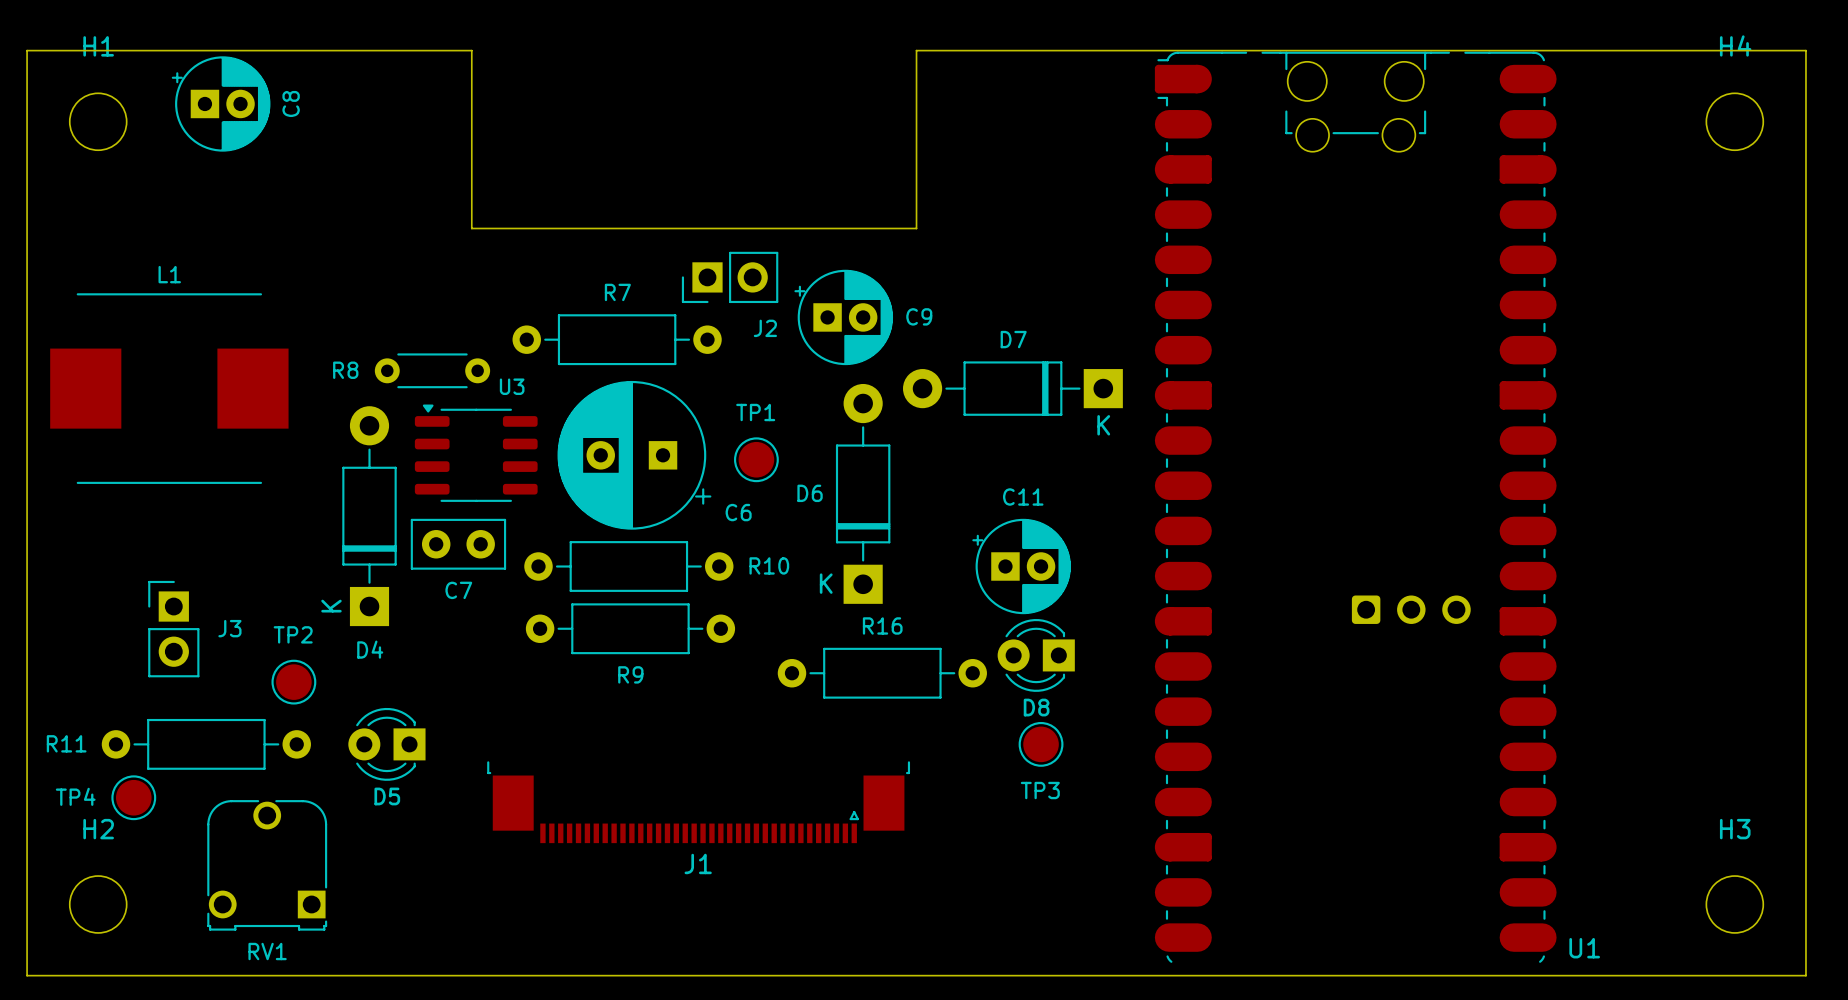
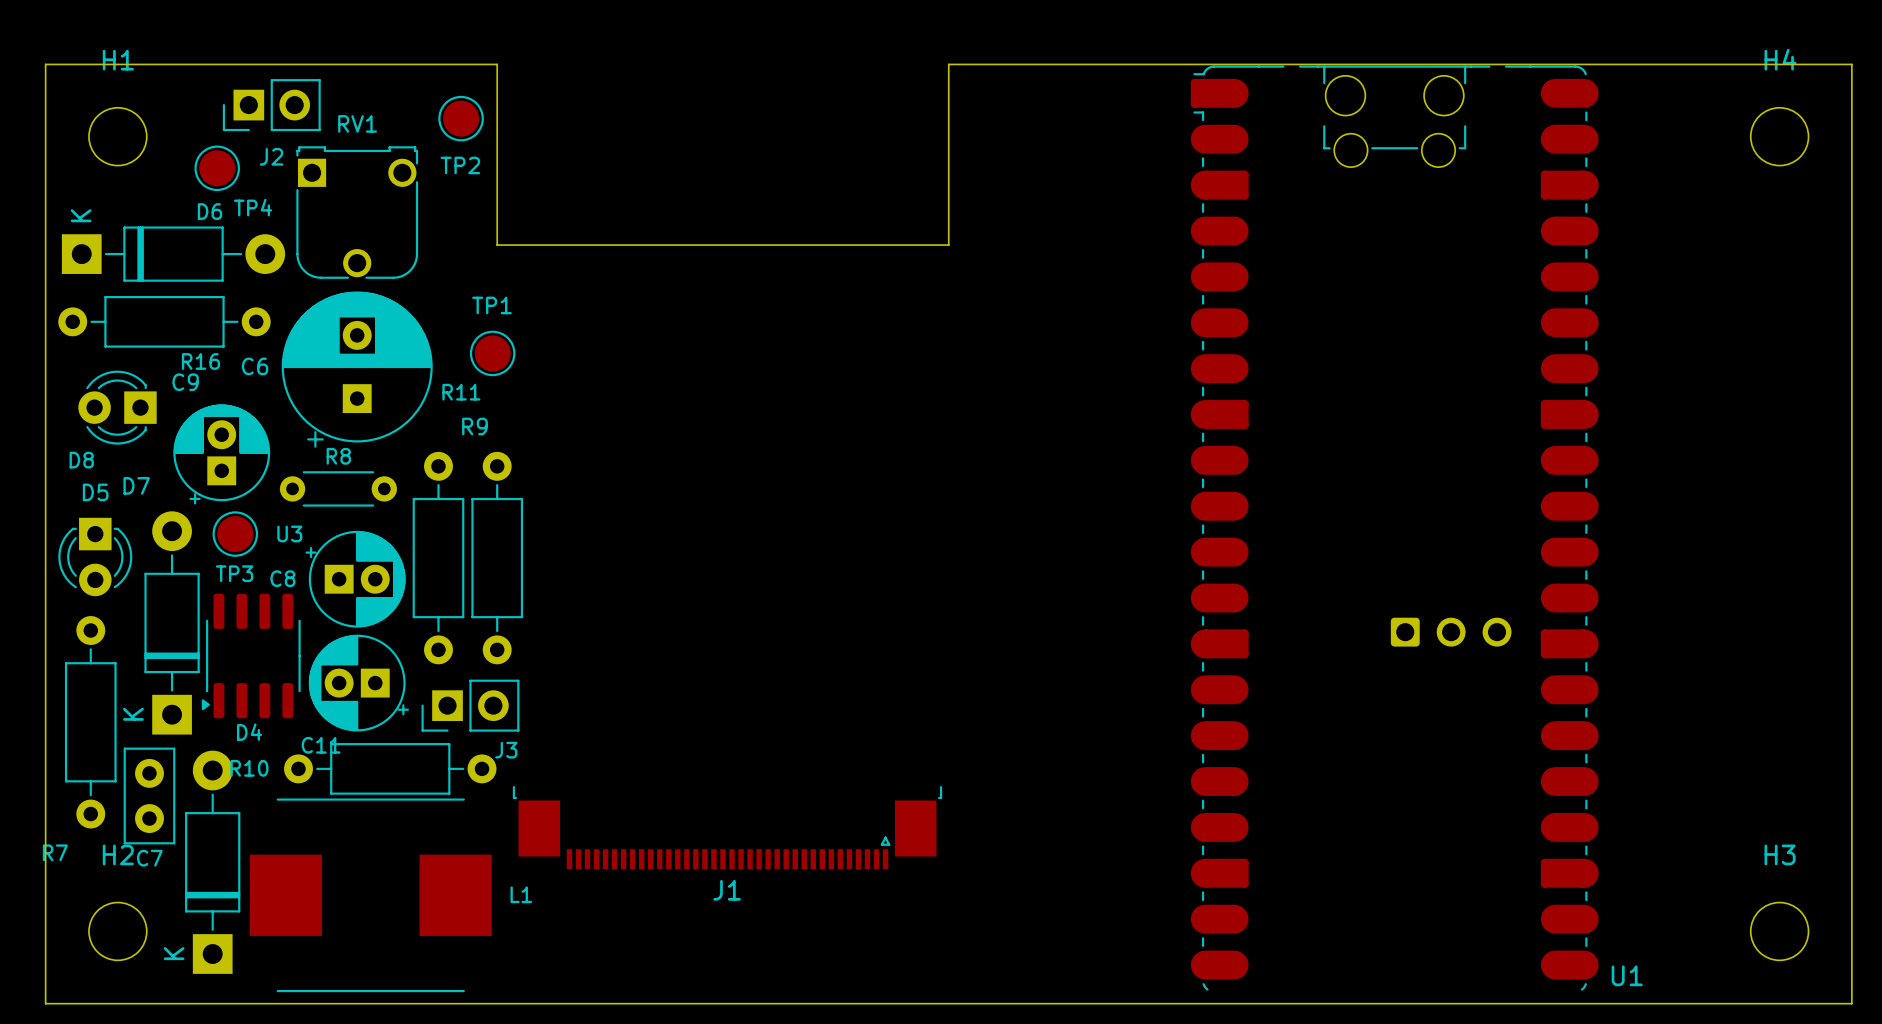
C8 position: (221, 103) -> (355, 579)
C8 name rotation: 0° (291, 103) -> 90° clockwise (282, 578)
C8 name position: C8 (291, 103) -> C8 (282, 578)
L1 name position: L1 (169, 274) -> L1 (521, 894)
J2 position: (730, 277) -> (271, 105)
R7 name position: R7 (617, 292) -> R7 (55, 852)
C9 name position: C9 (919, 316) -> C9 (185, 382)
C9 rotation: 0° (843, 317) -> 90° counterclockwise (221, 454)
C9 position: (843, 317) -> (221, 454)
J2 name position: J2 (765, 328) -> J2 (271, 156)
R7 rotation: 0° (617, 339) -> 90° clockwise (90, 722)
R7 position: (617, 339) -> (90, 722)
D7 name position: D7 (1013, 339) -> D7 (136, 485)
R8 name position: R8 (345, 370) -> R8 (338, 456)
R8 position: (432, 370) -> (338, 488)
U3 name position: U3 (512, 386) -> U3 (289, 533)
L1 position: (169, 388) -> (370, 895)
D7 rotation: 0° (1012, 388) -> 90° clockwise (172, 622)
D7 position: (1012, 388) -> (172, 622)
U3 rotation: 0° (476, 453) -> 90° counterclockwise (251, 655)
U3 position: (476, 453) -> (251, 655)
C6 rotation: 0° (634, 455) -> 90° clockwise (357, 369)
C6 position: (634, 455) -> (357, 369)
TP1 position: (756, 459) -> (492, 353)
D6 name position: D6 (810, 493) -> D6 (209, 211)
D6 rotation: 0° (863, 493) -> 90° clockwise (173, 254)
D6 position: (863, 493) -> (173, 254)
C11 name position: C11 (1023, 497) -> C11 (321, 745)
C6 name position: C6 (738, 512) -> C6 (255, 366)
D4 position: (369, 516) -> (212, 862)
C7 rotation: 0° (458, 544) -> 90° clockwise (149, 795)
C7 position: (458, 544) -> (149, 795)
R10 name position: R10 (769, 565) -> R10 (249, 768)
R10 position: (628, 566) -> (390, 768)
C11 rotation: 0° (1021, 566) -> 180° (358, 683)
C11 position: (1021, 566) -> (358, 683)
R16 name position: R16 (882, 625) -> R16 (200, 361)
J3 name position: J3 (229, 628) -> J3 (506, 750)
R9 rotation: 0° (630, 628) -> 90° clockwise (438, 558)
R9 position: (630, 628) -> (438, 558)
J3 rotation: 0° (173, 629) -> 90° counterclockwise (470, 705)
J3 position: (173, 629) -> (470, 705)
TP2 name position: TP2 (293, 634) -> TP2 (460, 165)
D4 name position: D4 (370, 649) -> D4 (249, 732)
D8 position: (1036, 655) -> (117, 407)
R16 position: (882, 673) -> (164, 321)
R9 name position: R9 (630, 674) -> R9 (474, 426)
TP2 position: (293, 682) -> (461, 118)
D8 name position: D8 (1036, 707) -> D8 (81, 460)
R11 name position: R11 (66, 743) -> R11 (461, 392)
R11 rotation: 0° (206, 744) -> 90° clockwise (497, 558)
R11 position: (206, 744) -> (497, 558)
D5 rotation: 0° (386, 744) -> 90° counterclockwise (95, 557)
D5 position: (386, 744) -> (95, 557)
TP3 position: (1041, 744) -> (235, 534)
TP3 name position: TP3 (1040, 790) -> TP3 (234, 573)
TP4 name position: TP4 (75, 796) -> TP4 (253, 207)
D5 name position: D5 (387, 796) -> D5 (95, 492)
TP4 position: (133, 797) -> (217, 168)
RV1 rotation: 0° (267, 865) -> 180° (357, 212)
RV1 position: (267, 865) -> (357, 212)

